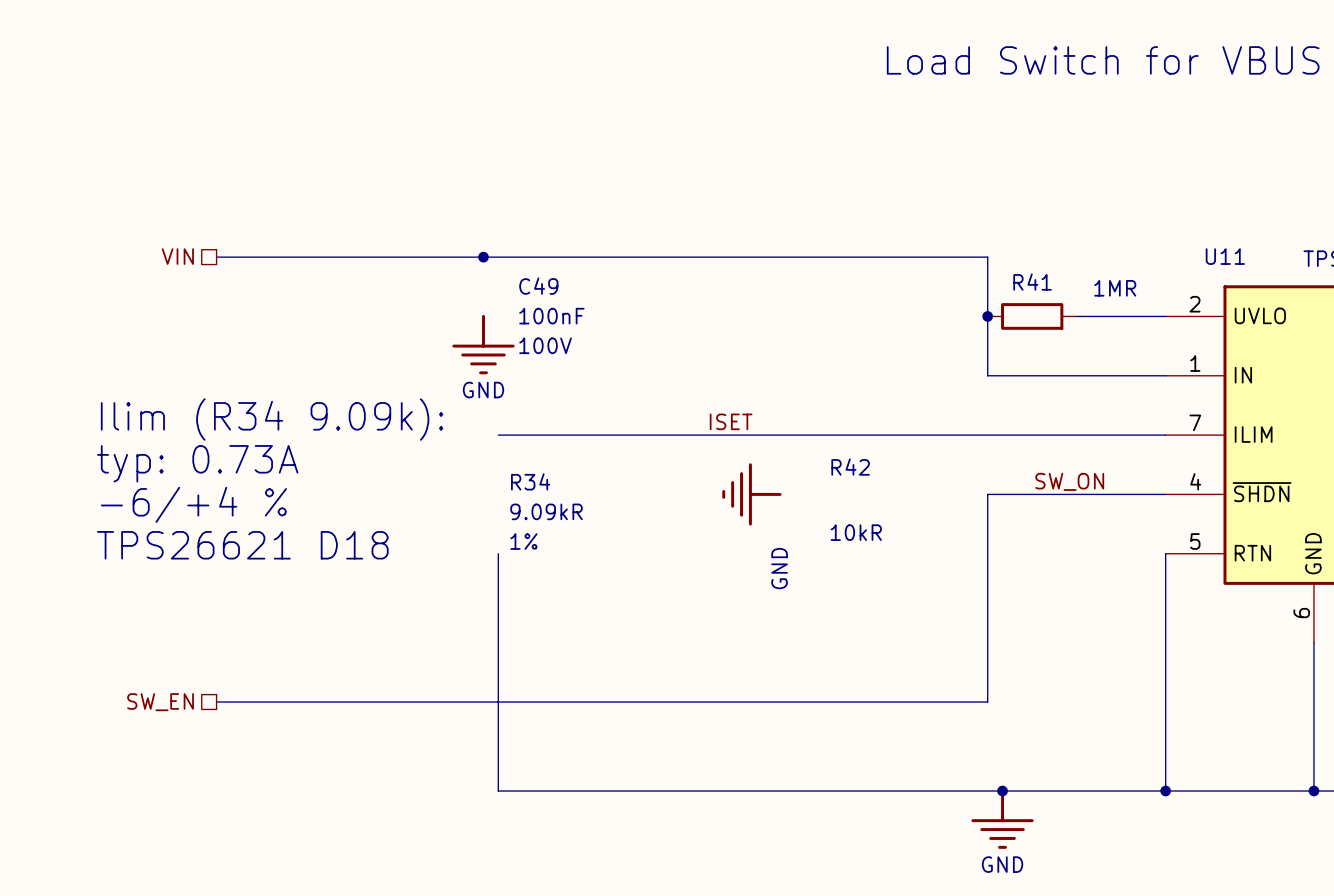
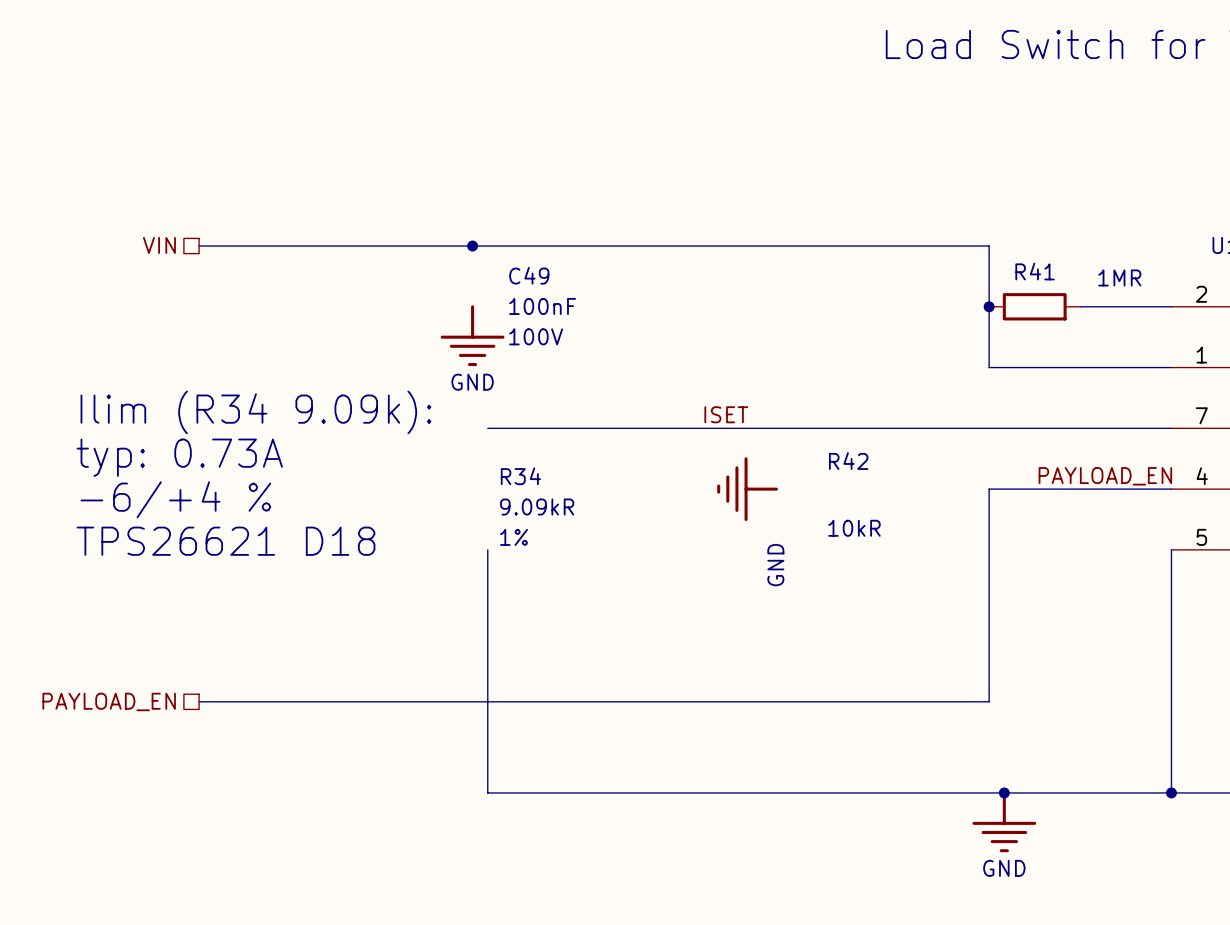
label: SW_ON (1069, 481) -> PAYLOAD_EN (1105, 476)
hierarchical label: SW_EN (160, 702) -> PAYLOAD_EN (109, 701)

